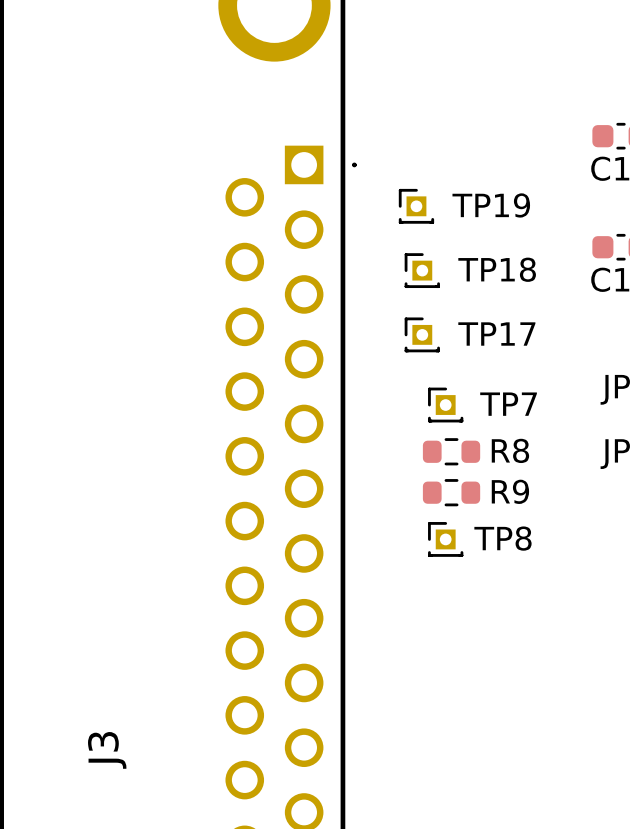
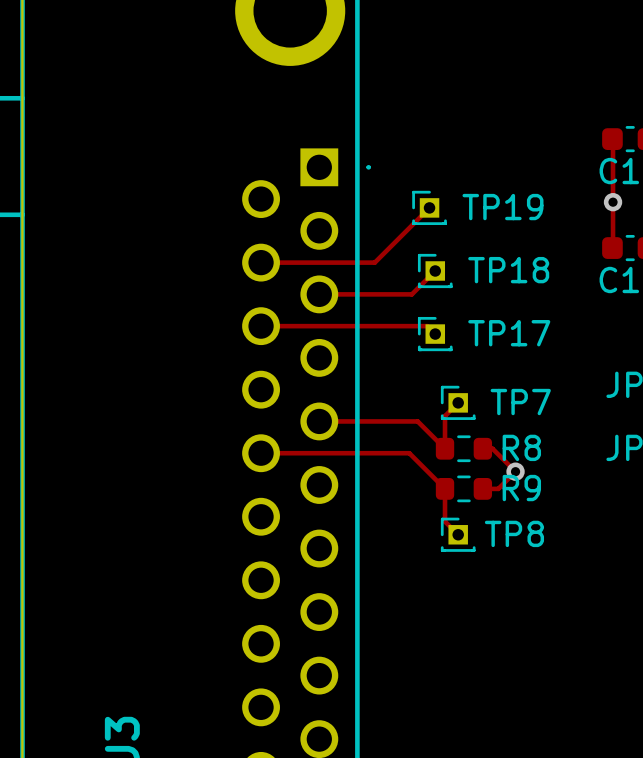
track: none -> (612, 139) (612, 248)
via: none -> (613, 202)
track: none -> (429, 207) (374, 262) (261, 262)
track: none -> (435, 270) (411, 294) (319, 294)
track: none -> (261, 326) (427, 326) (435, 334)
track: none -> (458, 402) (445, 416) (445, 448) (417, 421) (319, 421)
track: none -> (482, 448) (492, 448) (515, 471) (498, 488) (482, 488)
track: none -> (261, 453) (409, 453) (445, 488) (445, 521) (458, 534)
via: none -> (515, 471)

